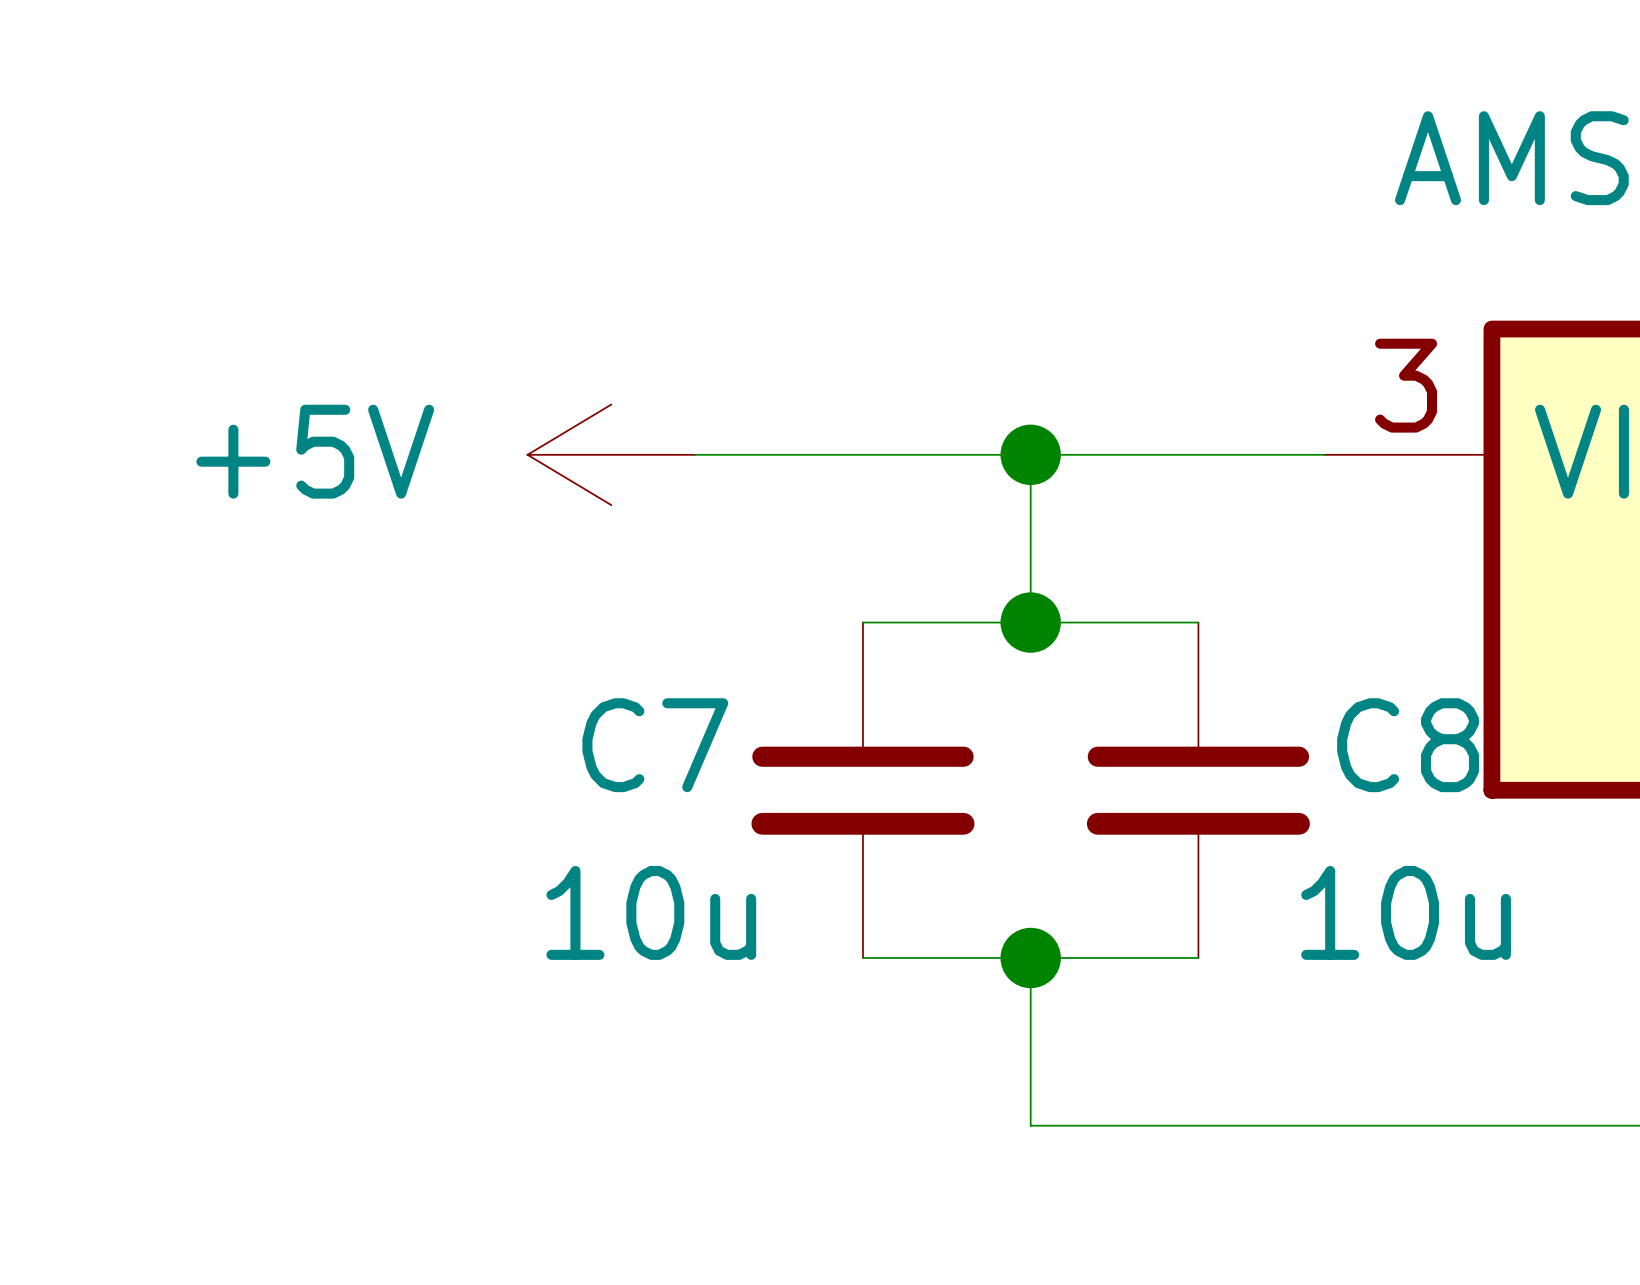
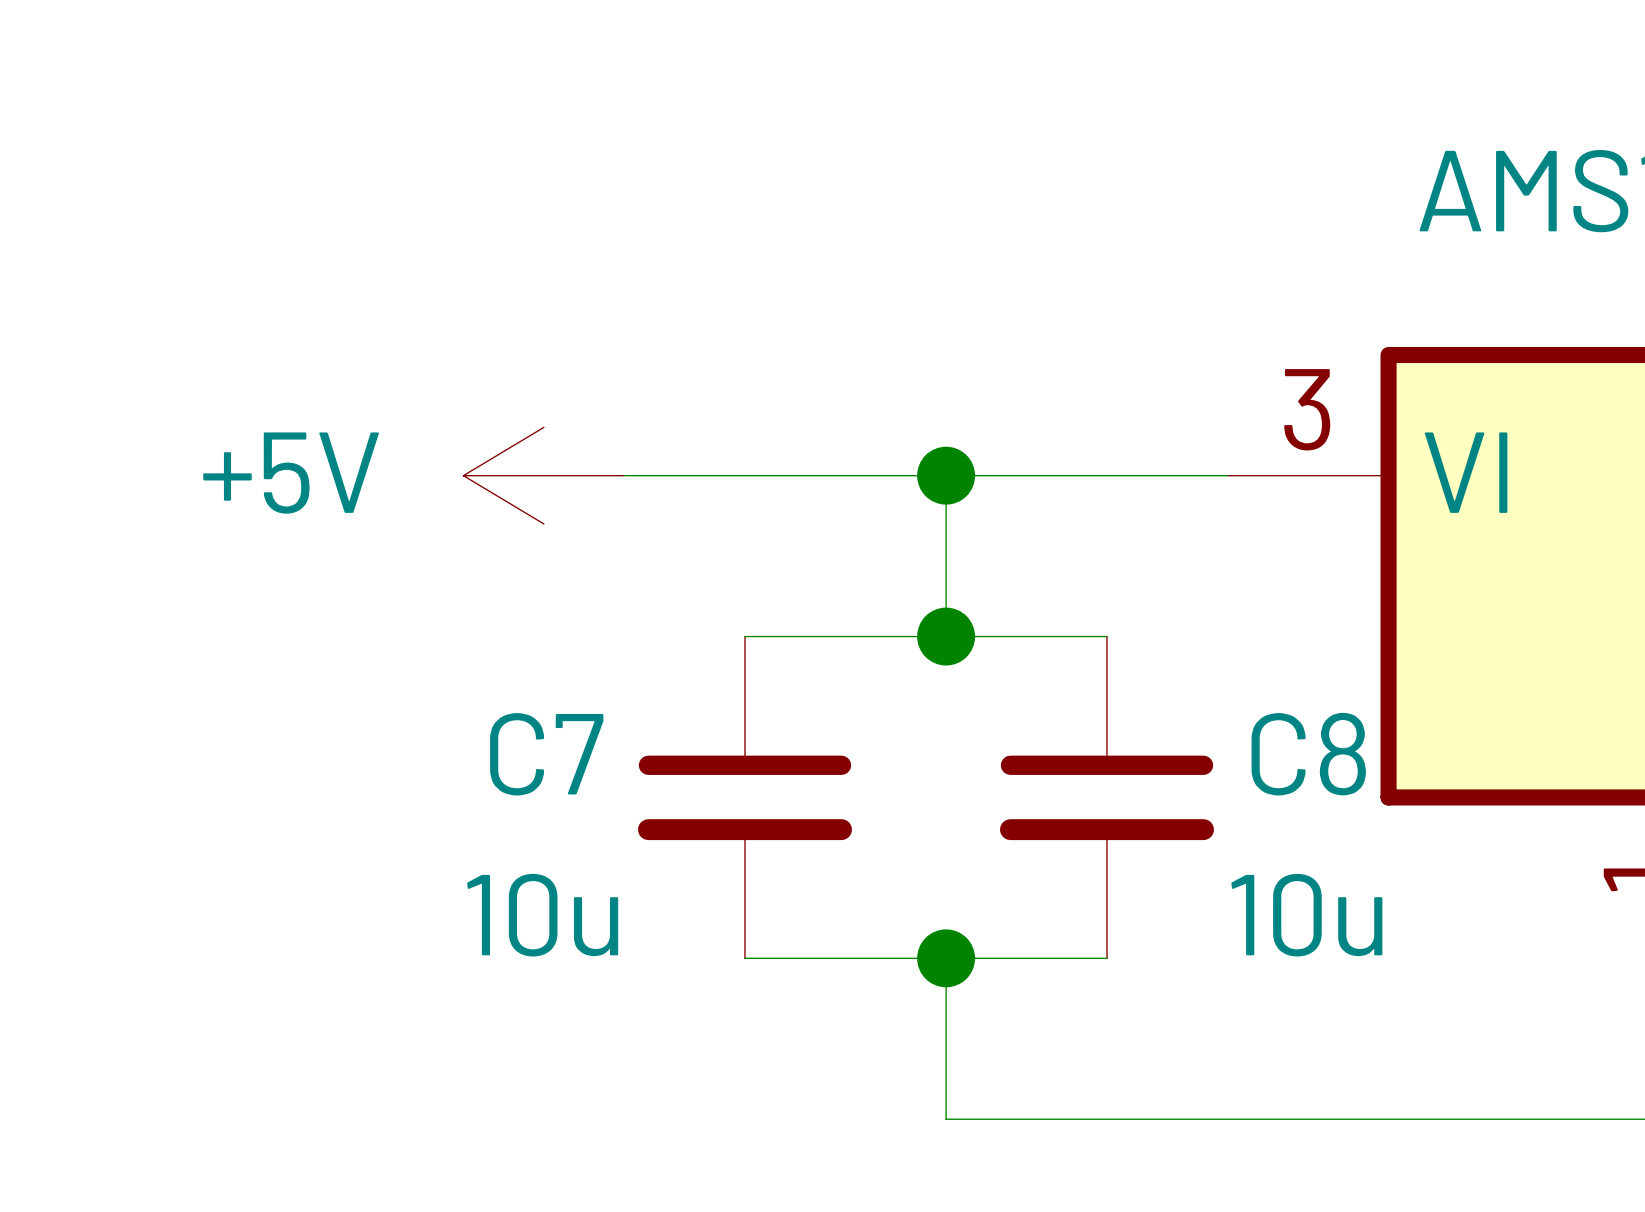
wire: none -> (744, 636) (785, 636)
C7 position: (862, 790) -> (744, 797)
wire: none -> (744, 958) (785, 958)

